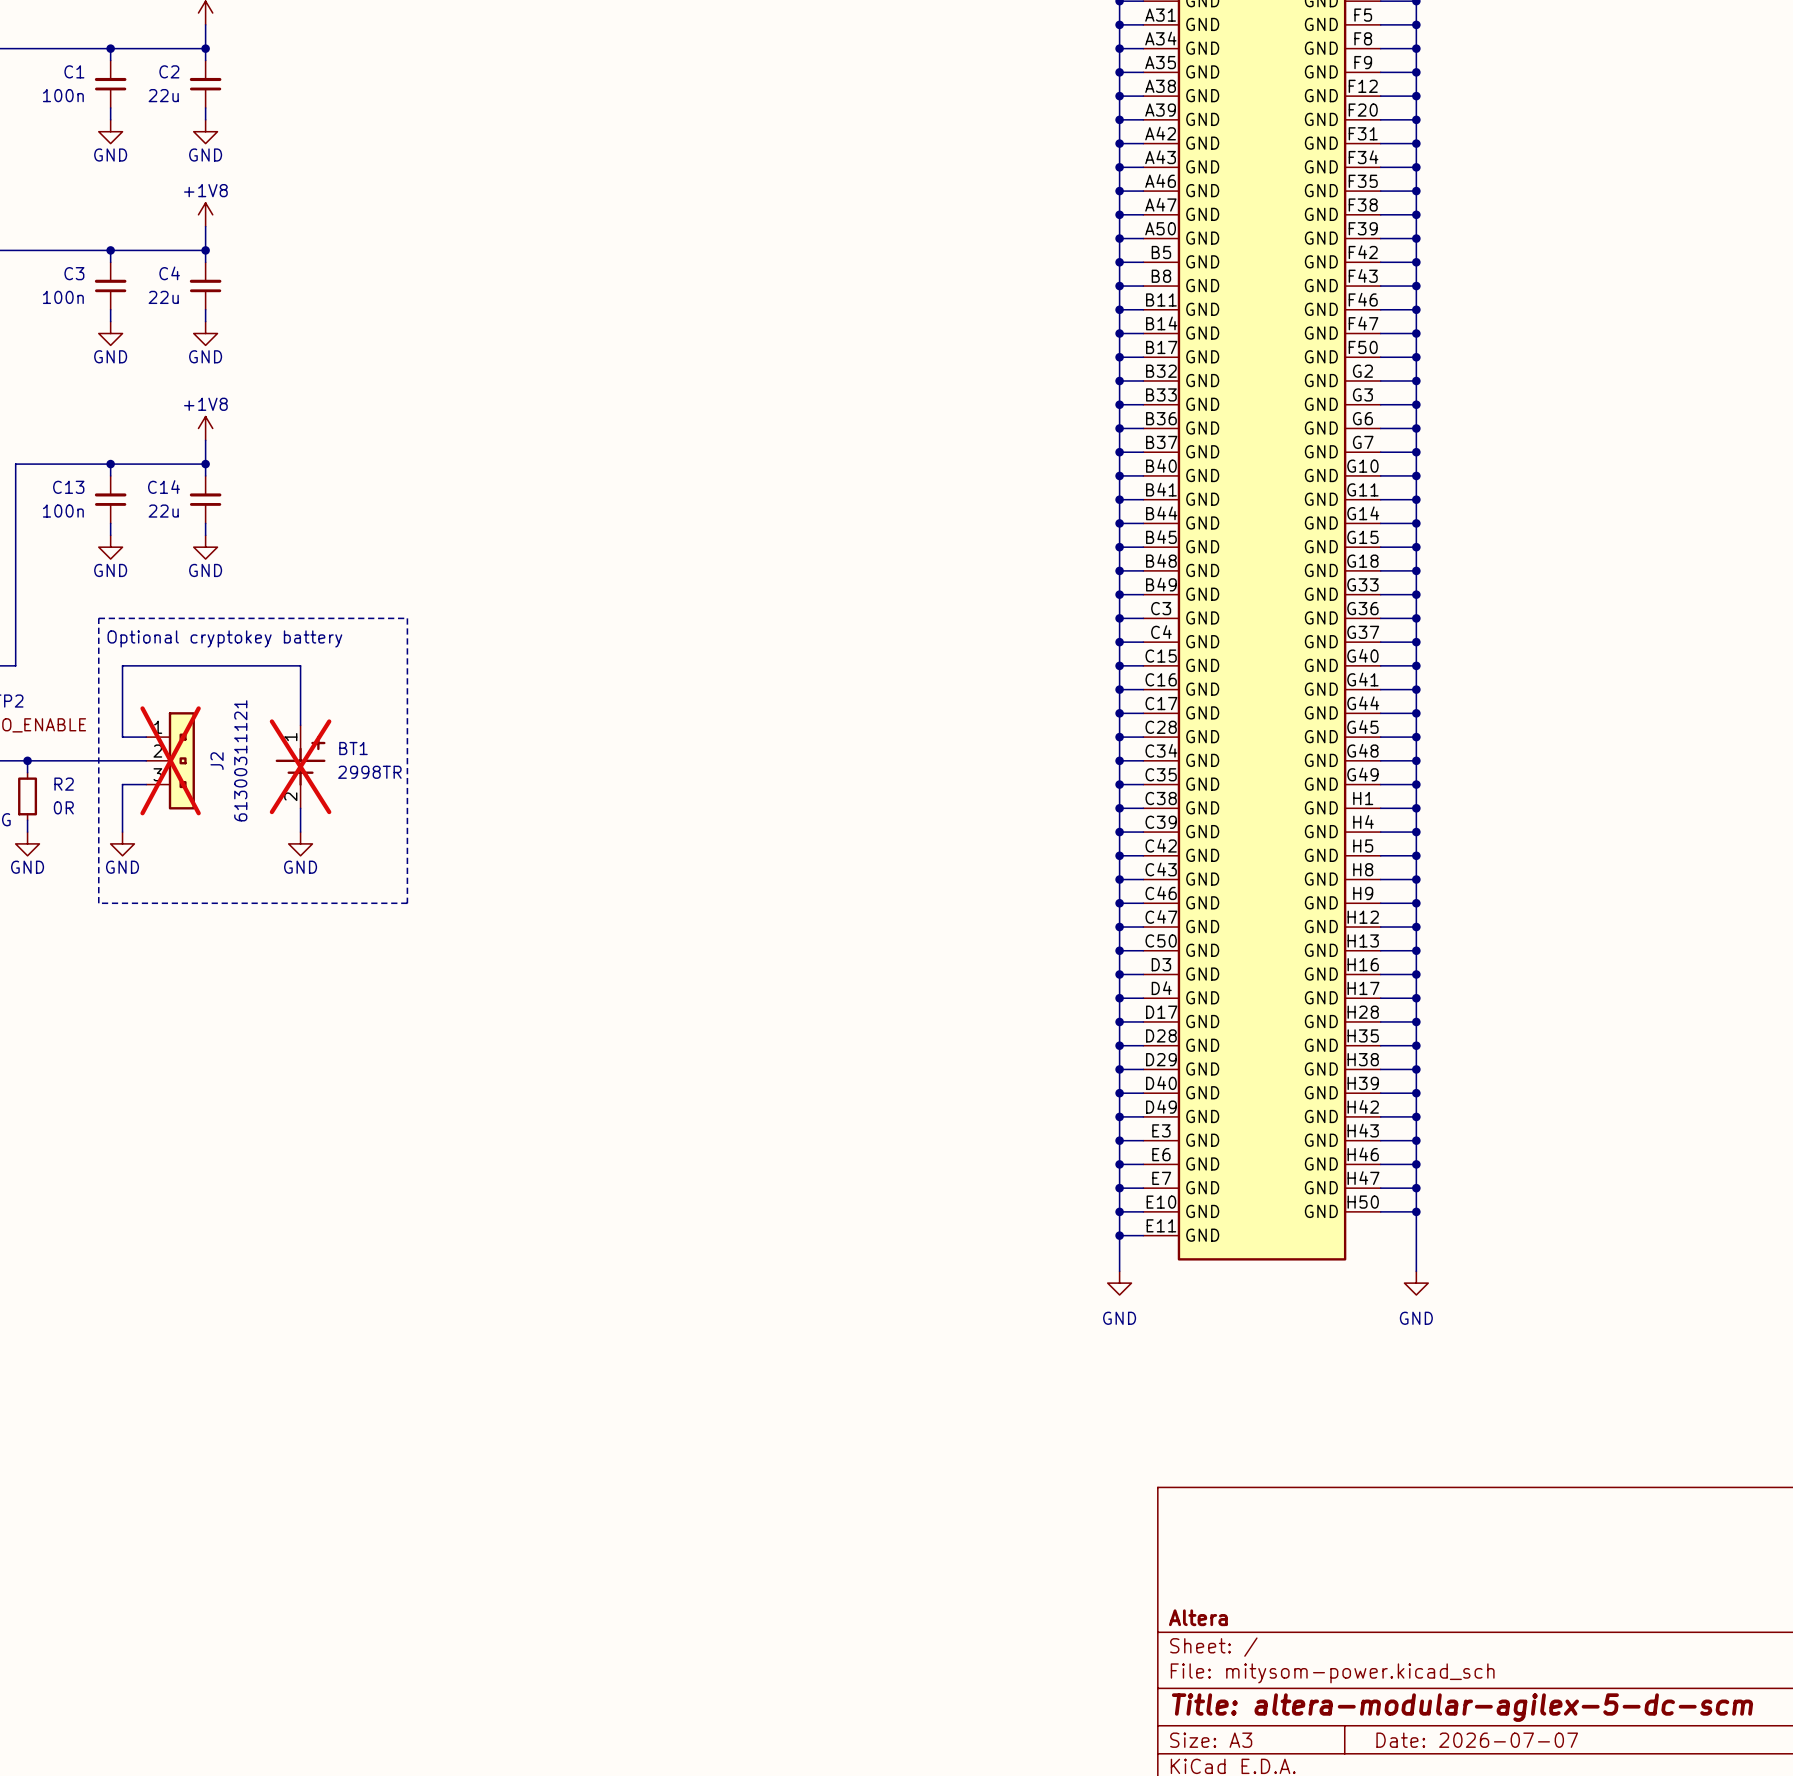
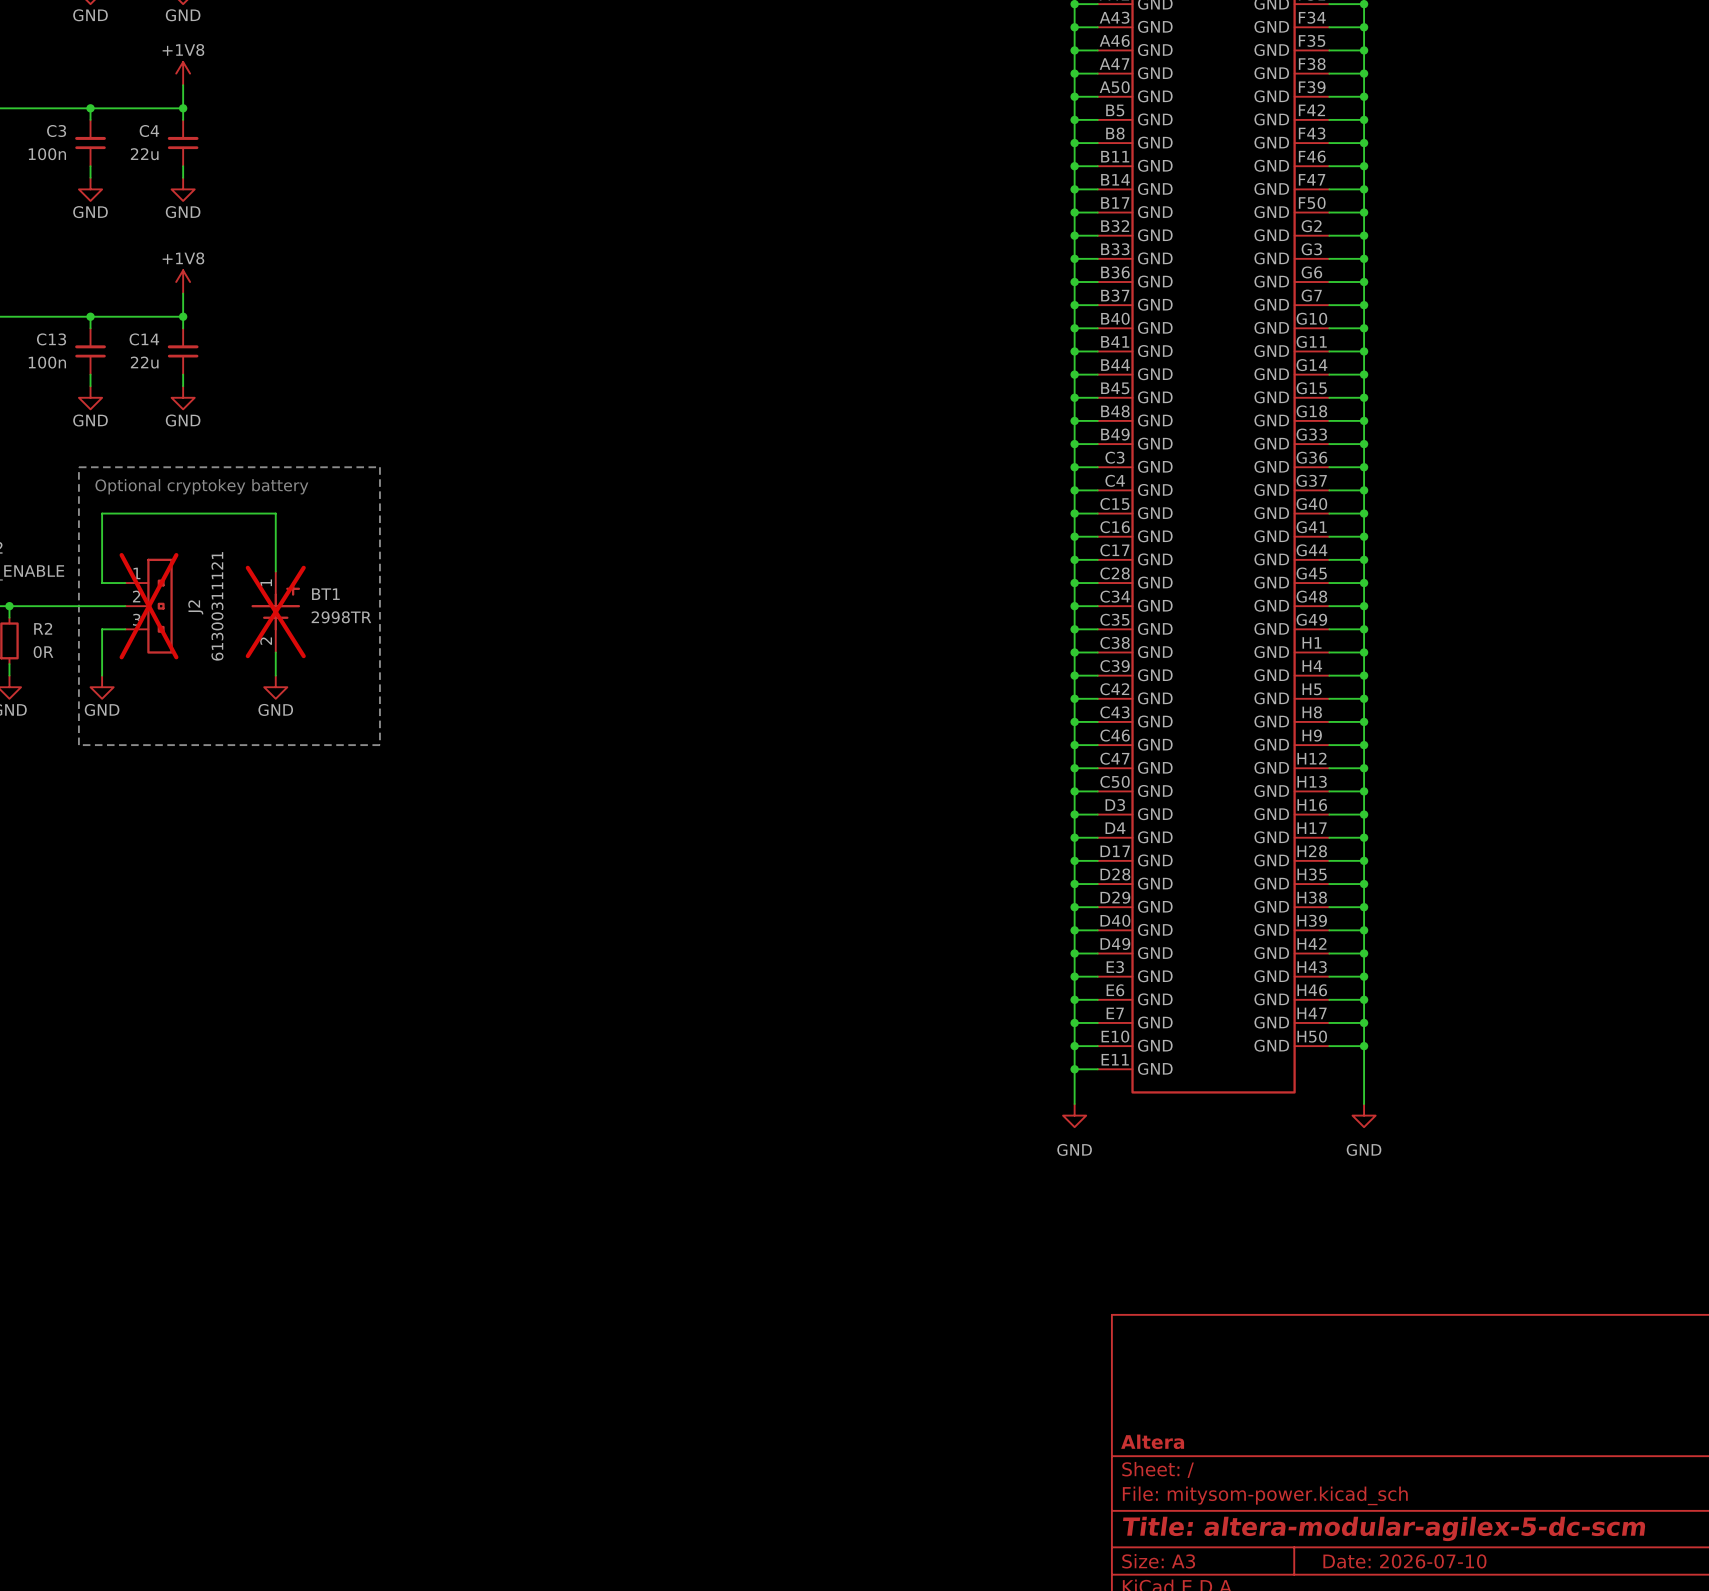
title block: Date: 2026-07-07 (1477, 1740) -> Date: 2026-07-10 (1404, 1561)

